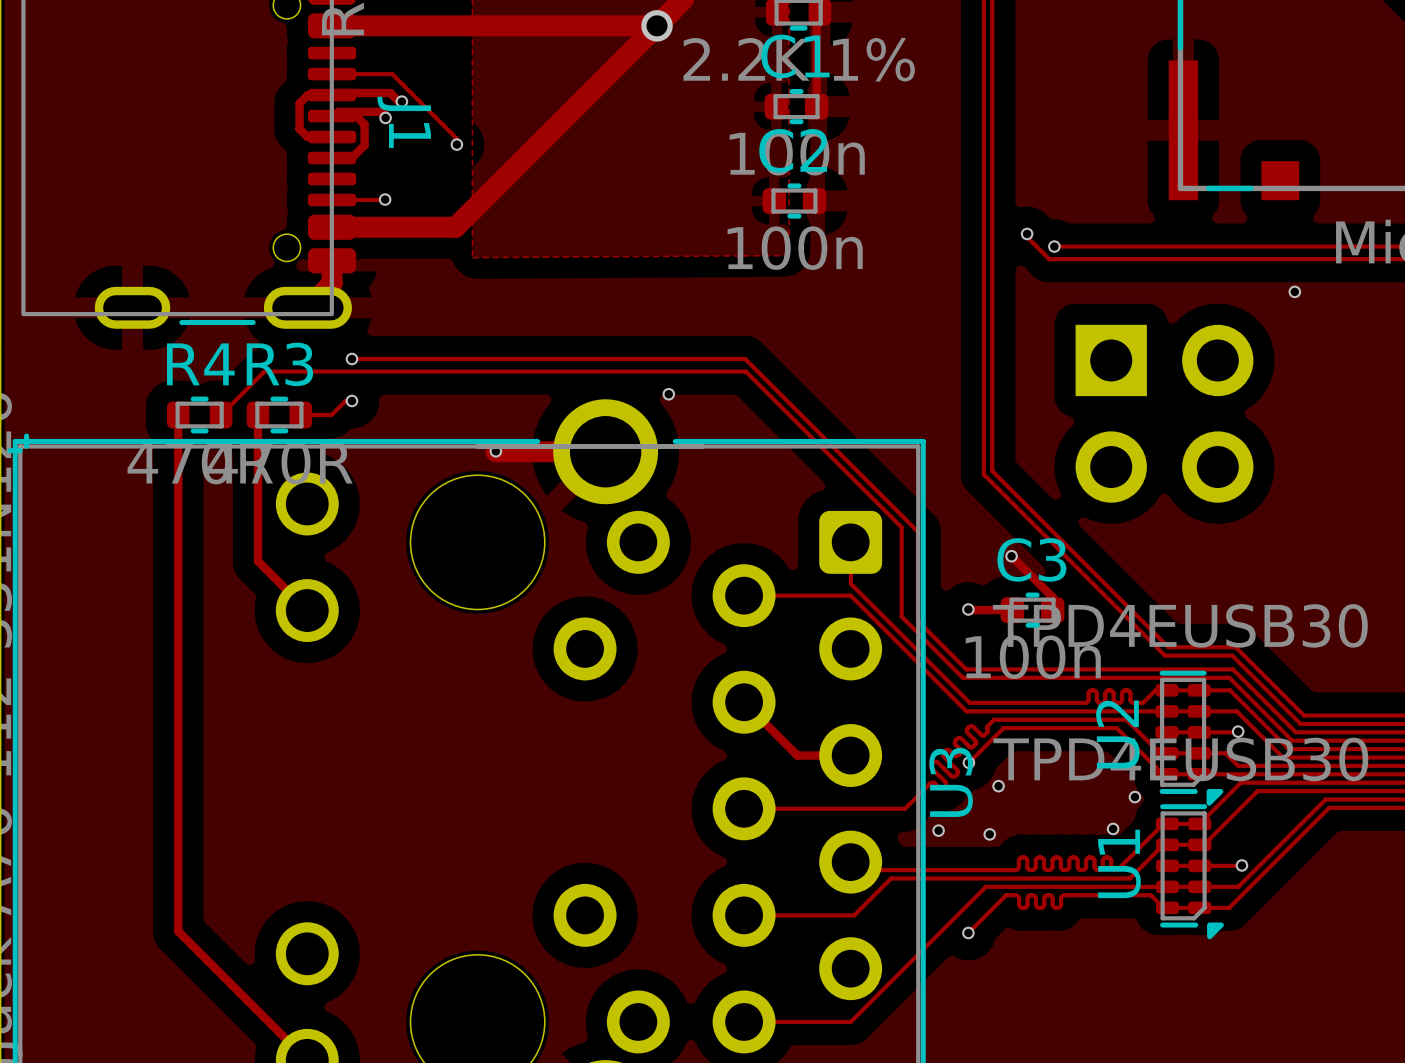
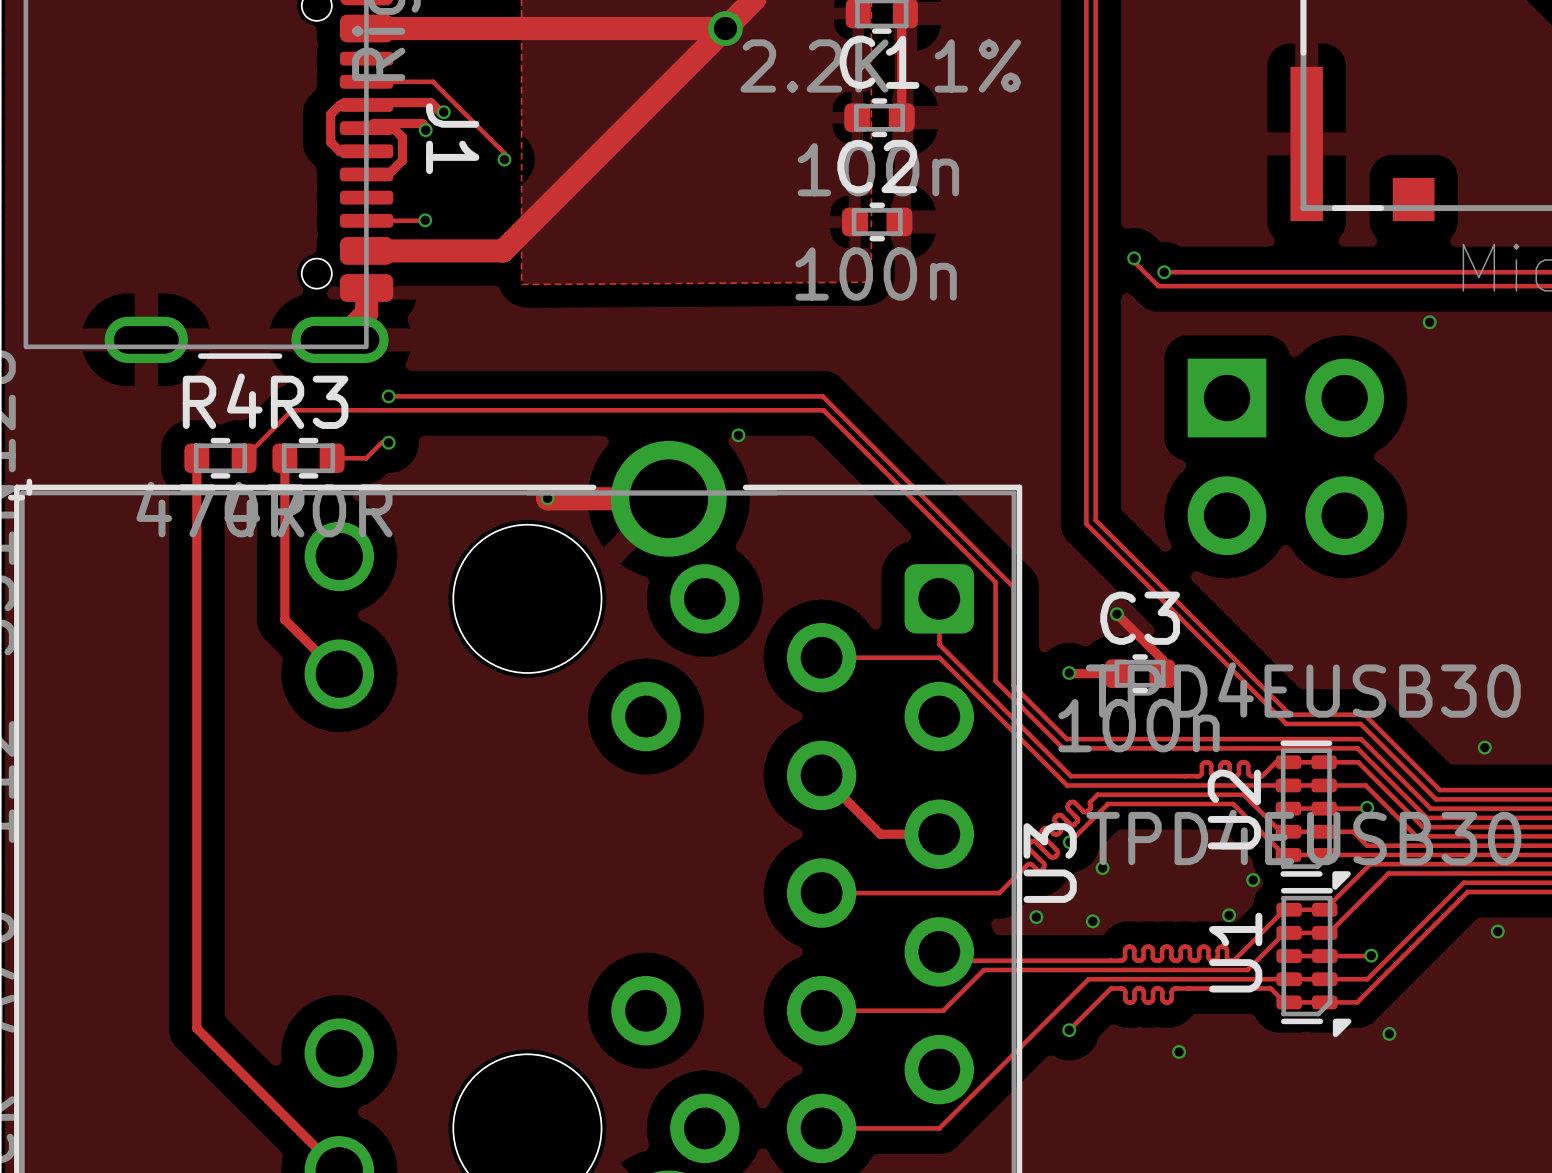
via: none -> (1484, 747)
via: none -> (1497, 931)
via: none -> (1389, 1033)
via: none -> (1179, 1051)

